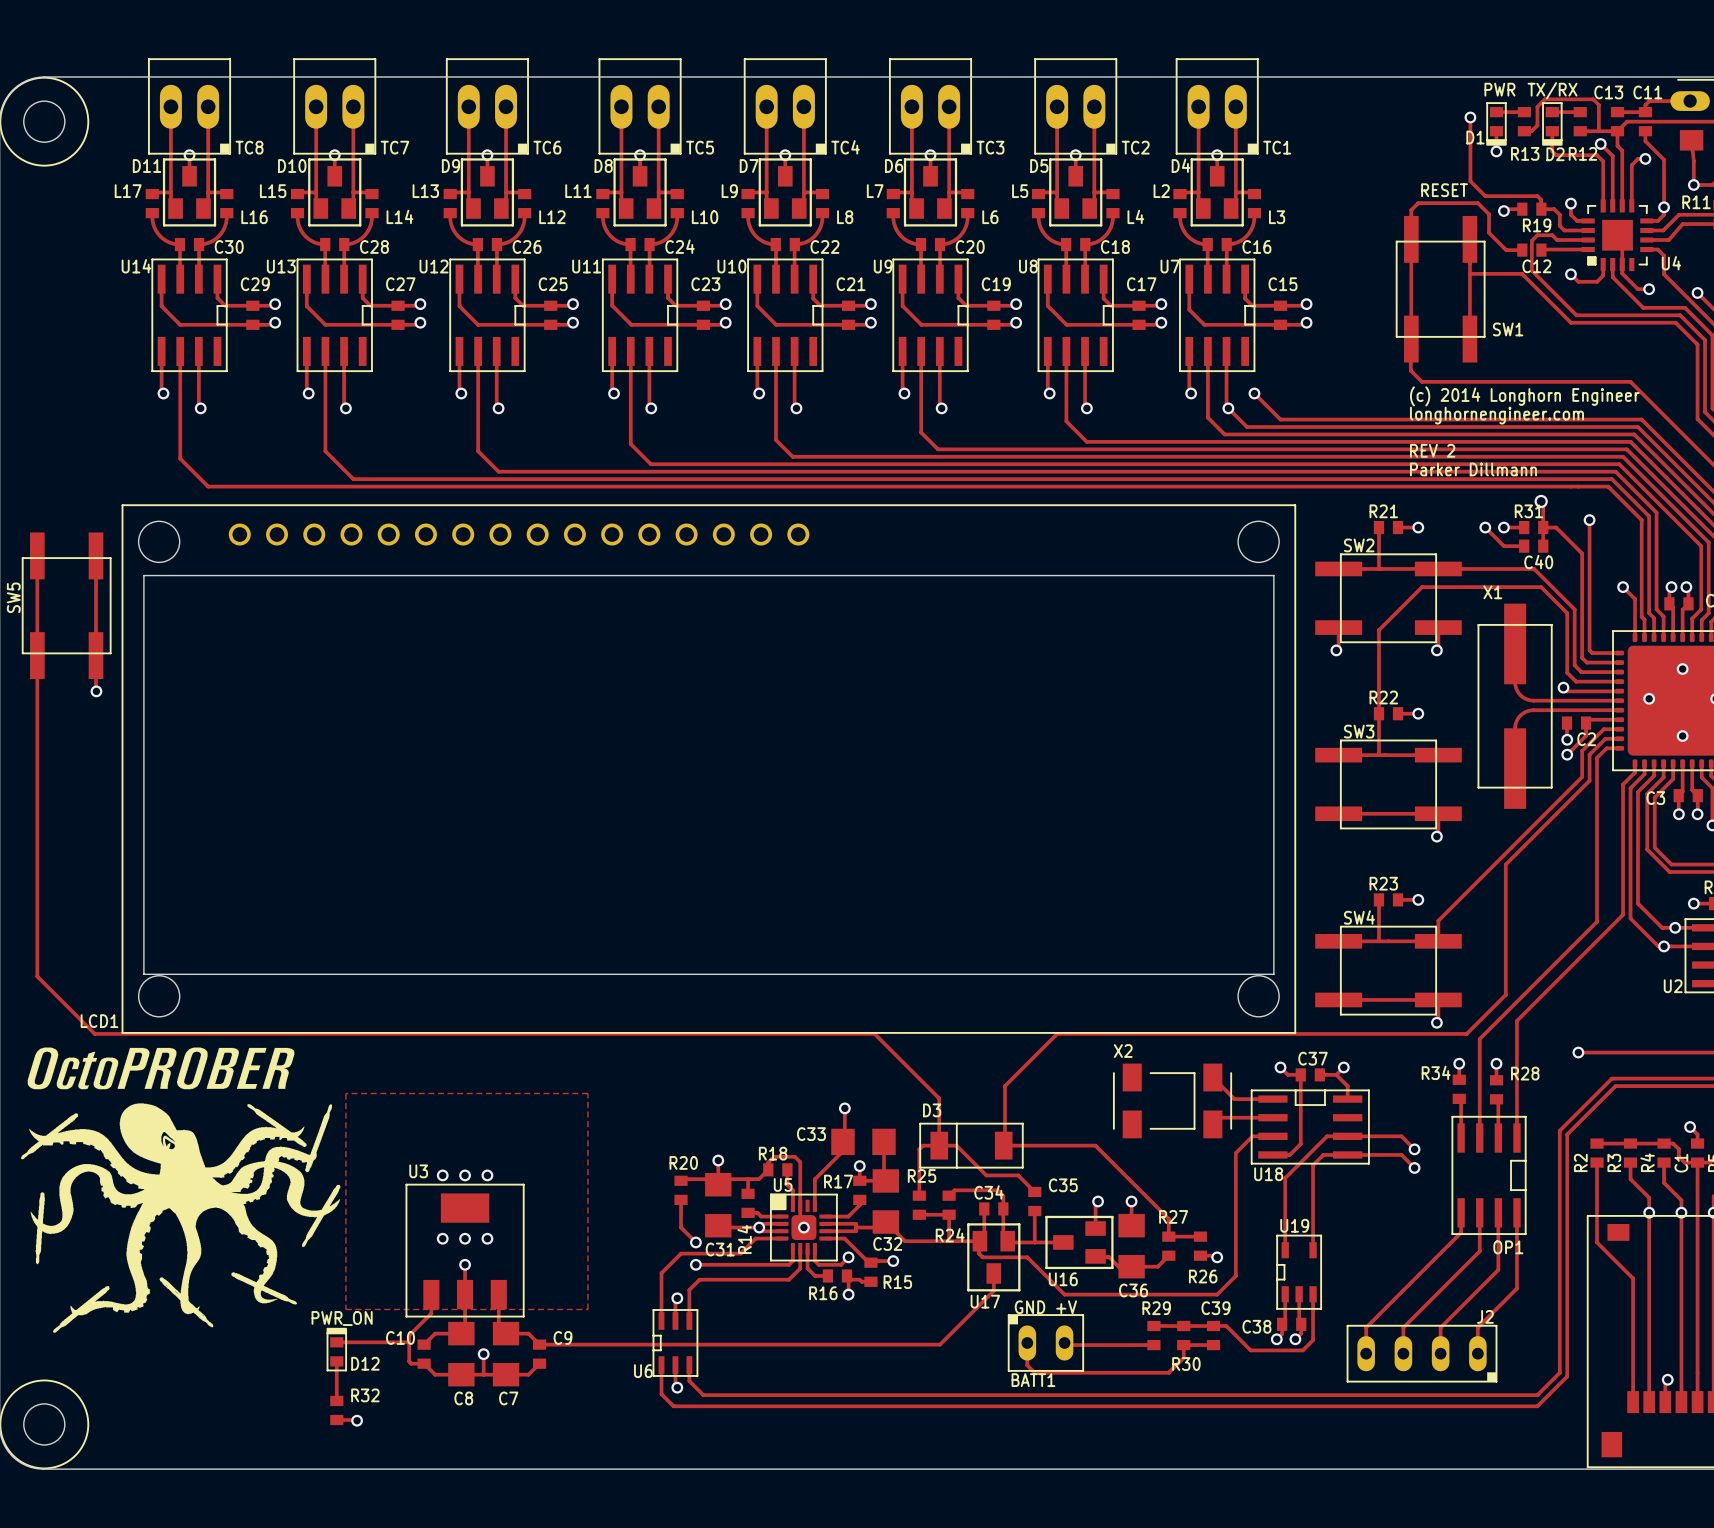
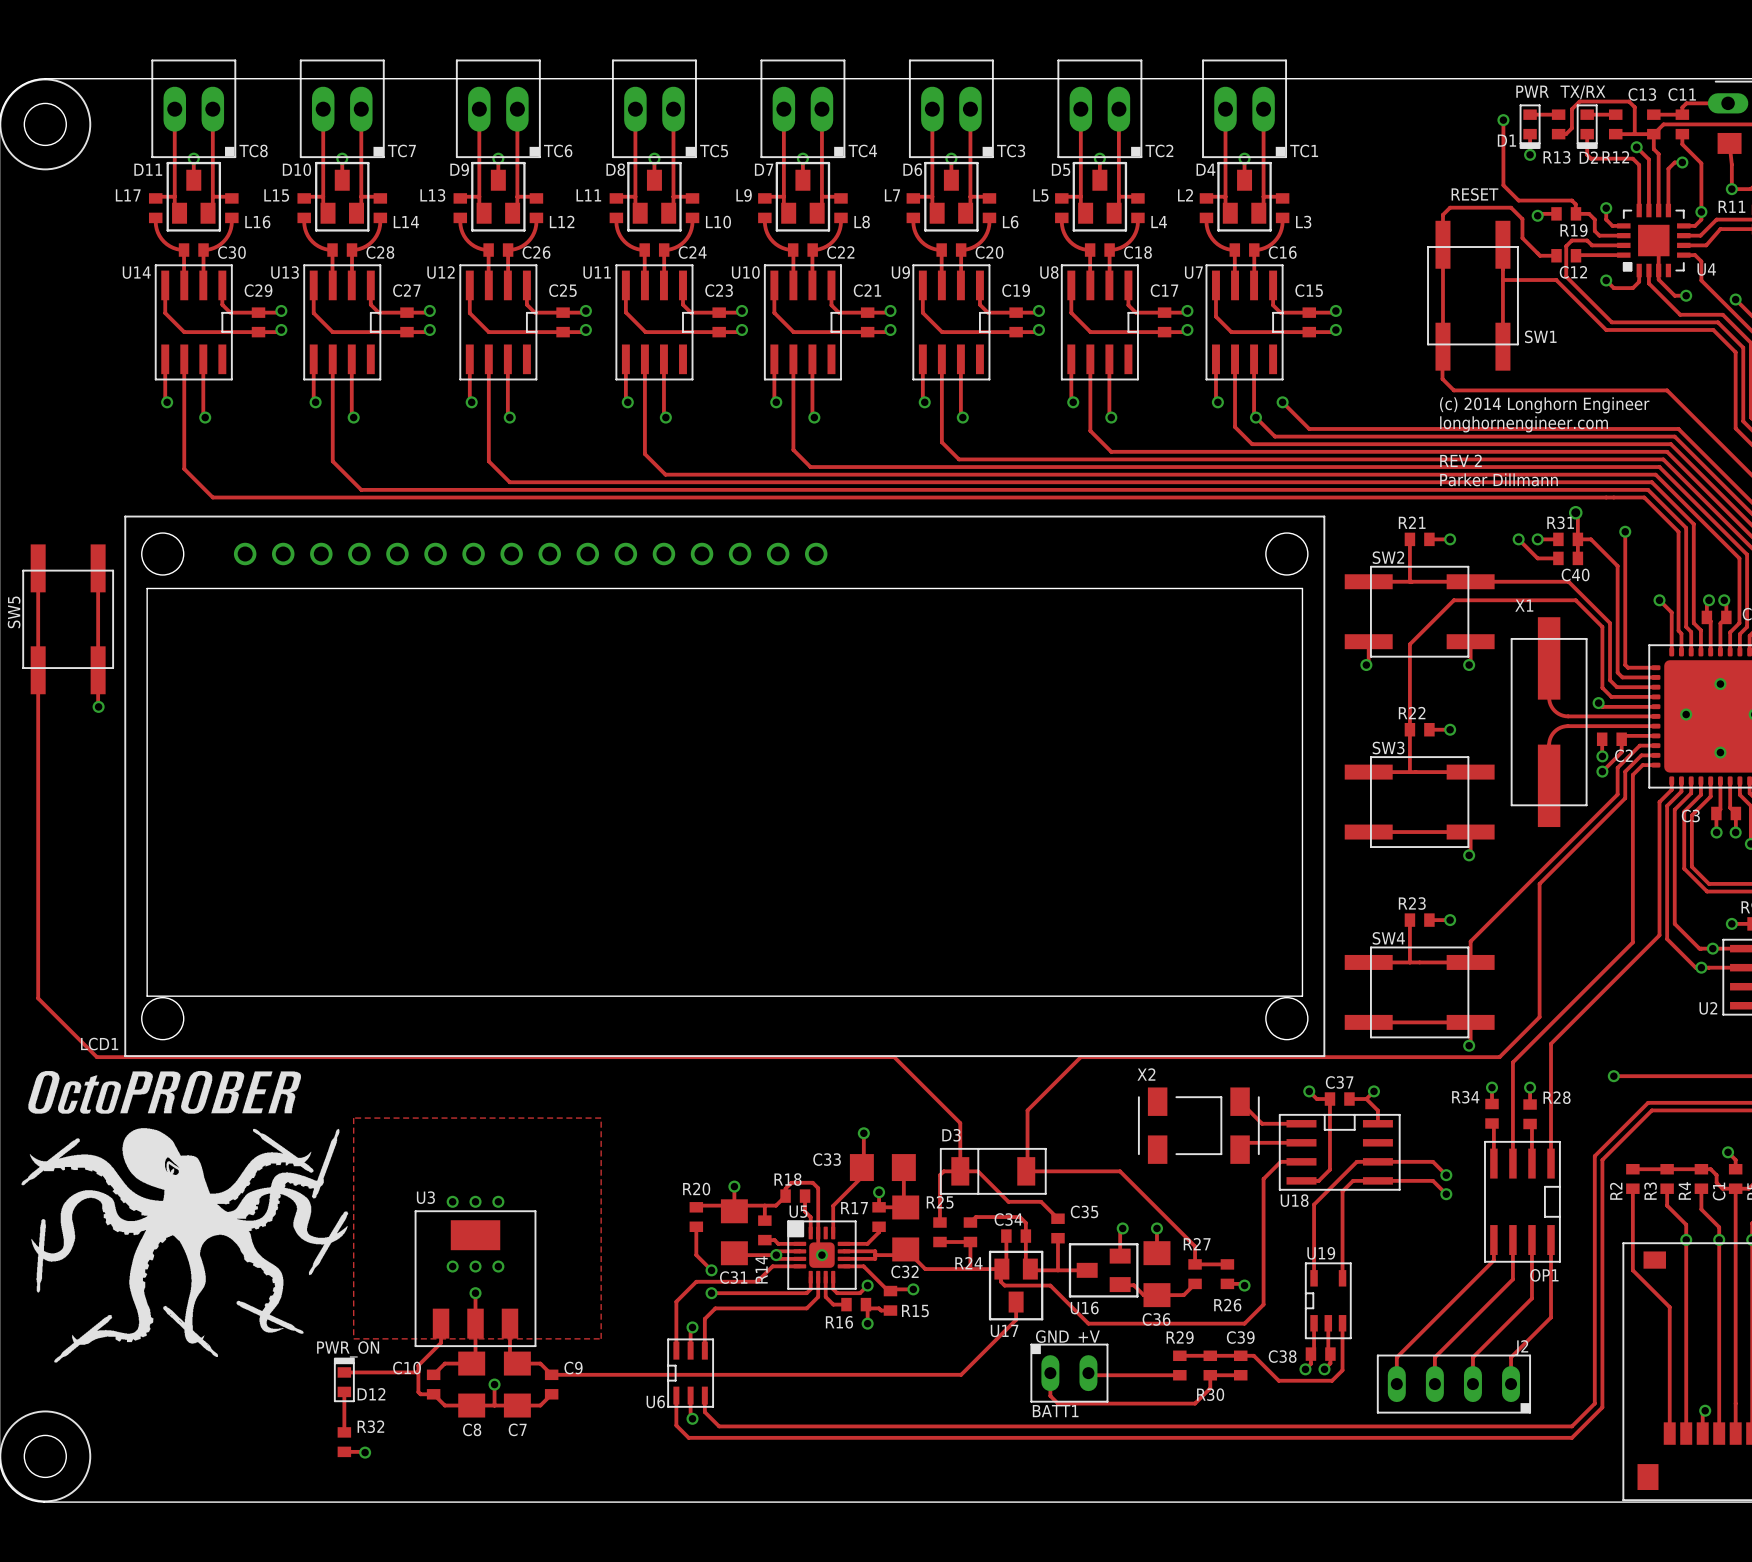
LCD1 footprint: [121, 504, 1297, 1034] -> [124, 515, 1326, 1058]

